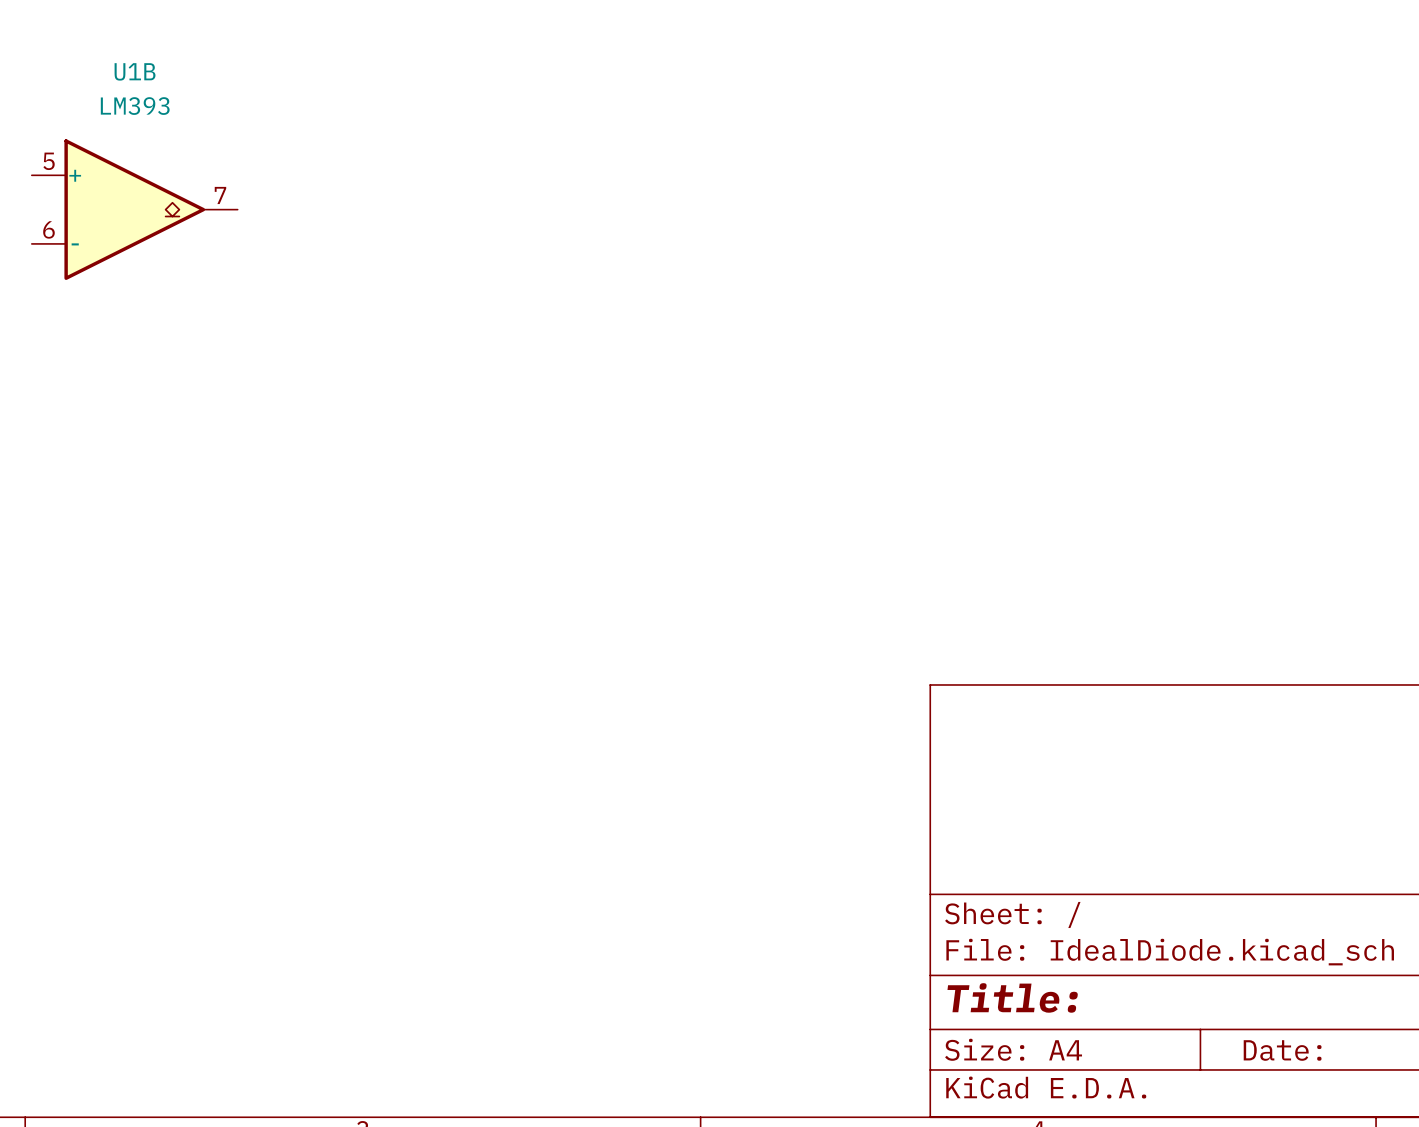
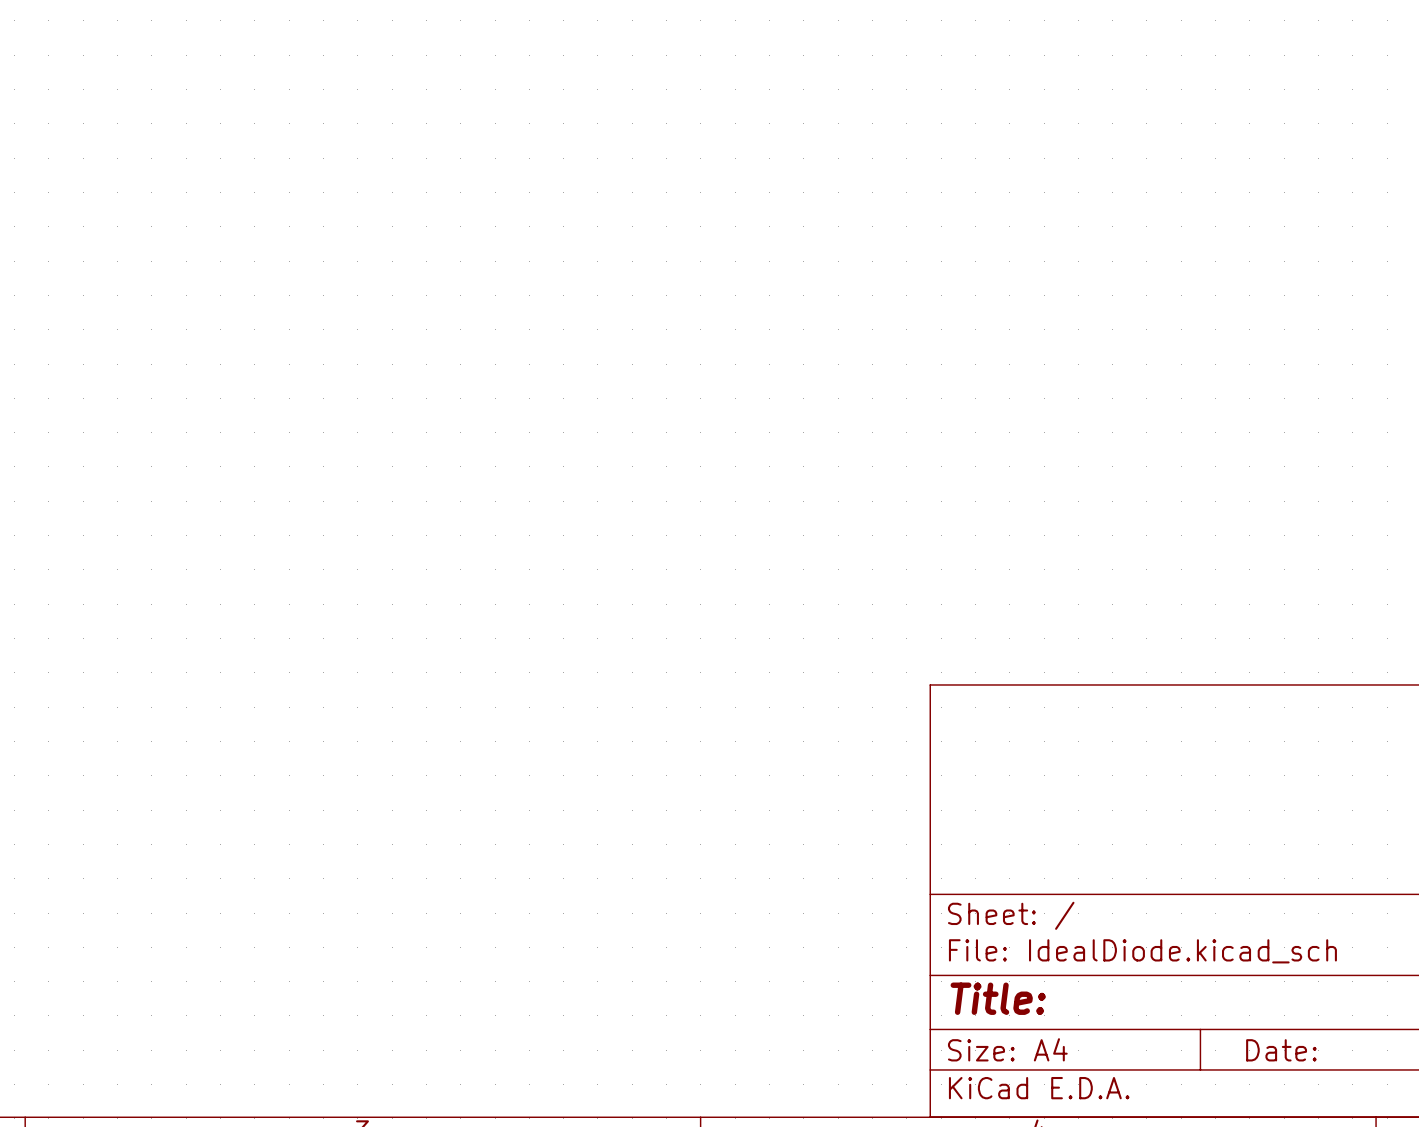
U1B: LM393 (134, 209) -> none

